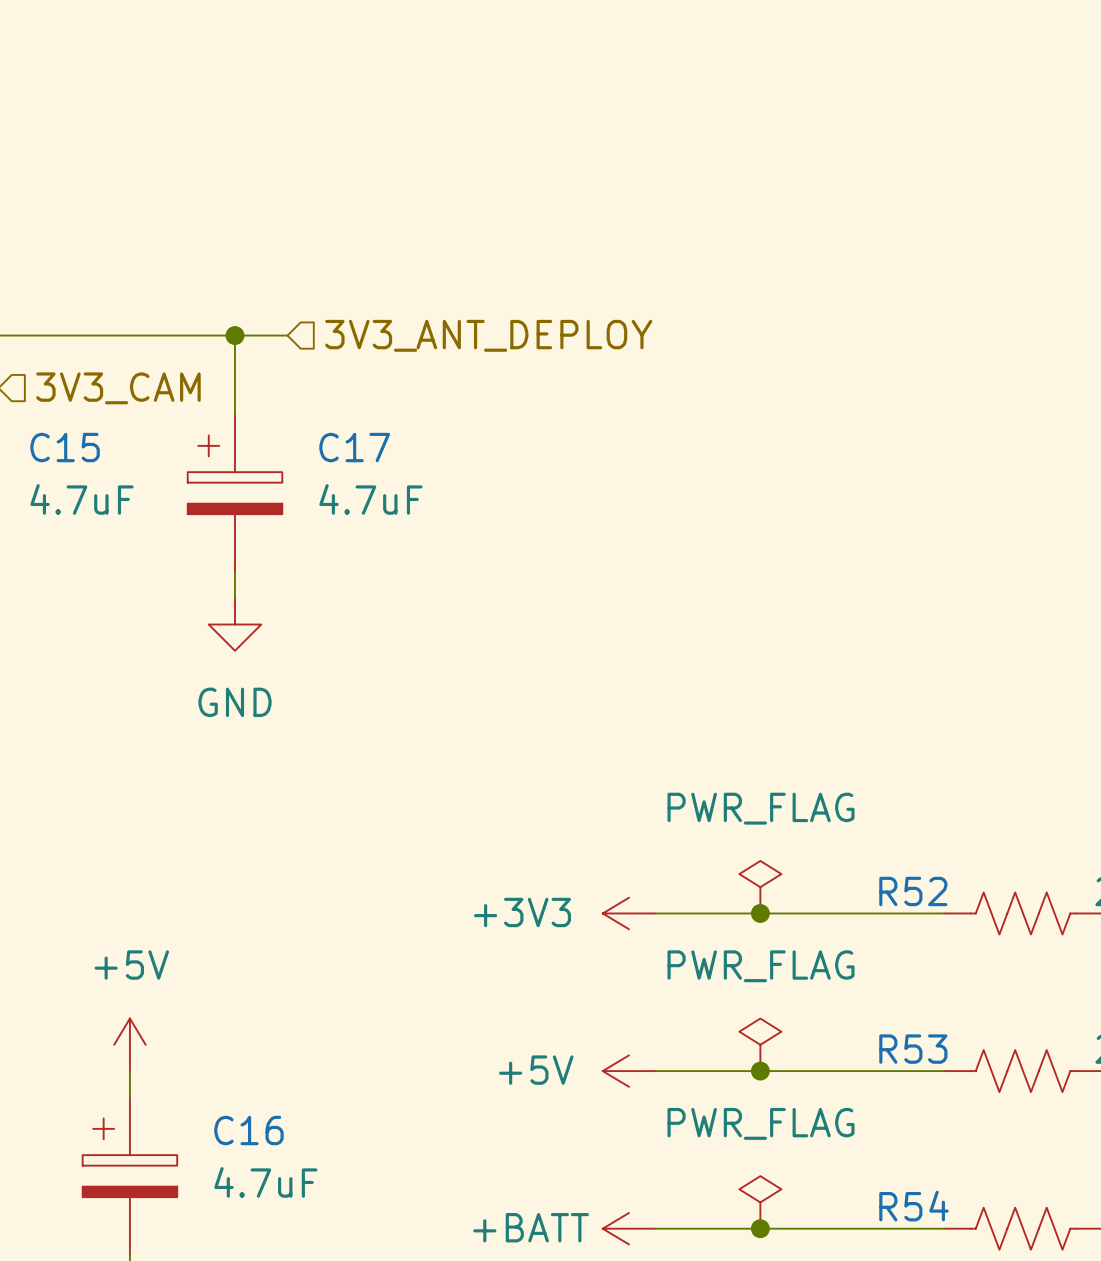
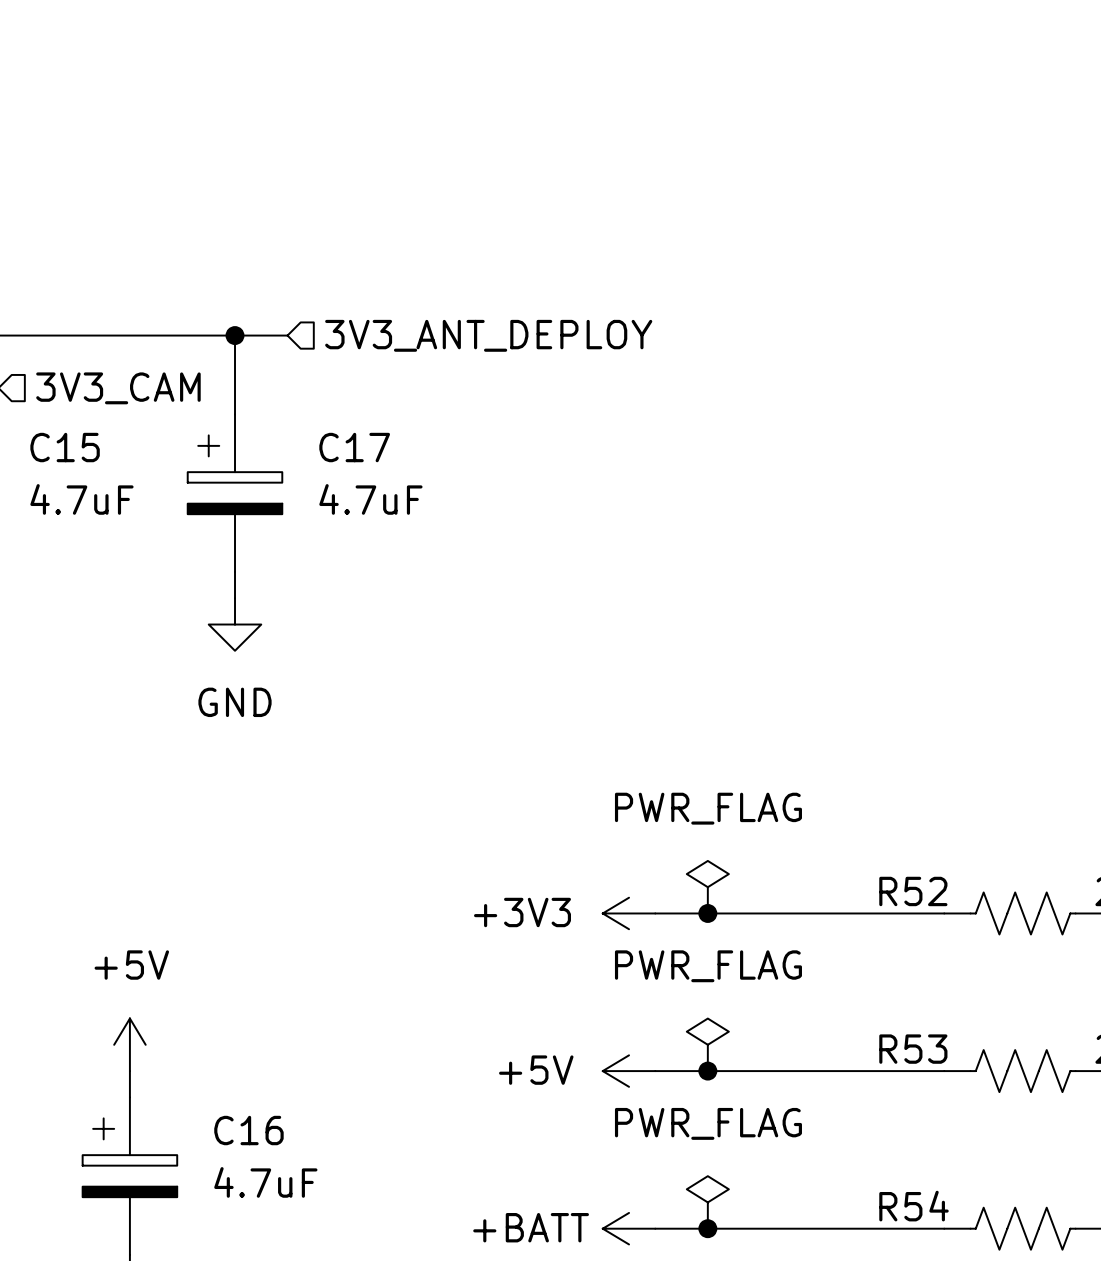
power symbol position: PWR_FLAG (760, 887) -> PWR_FLAG (707, 887)
junction position: (760, 913) -> (707, 913)
power symbol position: PWR_FLAG (760, 1044) -> PWR_FLAG (707, 1044)
junction position: (760, 1071) -> (707, 1071)
power symbol position: PWR_FLAG (760, 1202) -> PWR_FLAG (707, 1202)
junction position: (760, 1228) -> (707, 1228)

